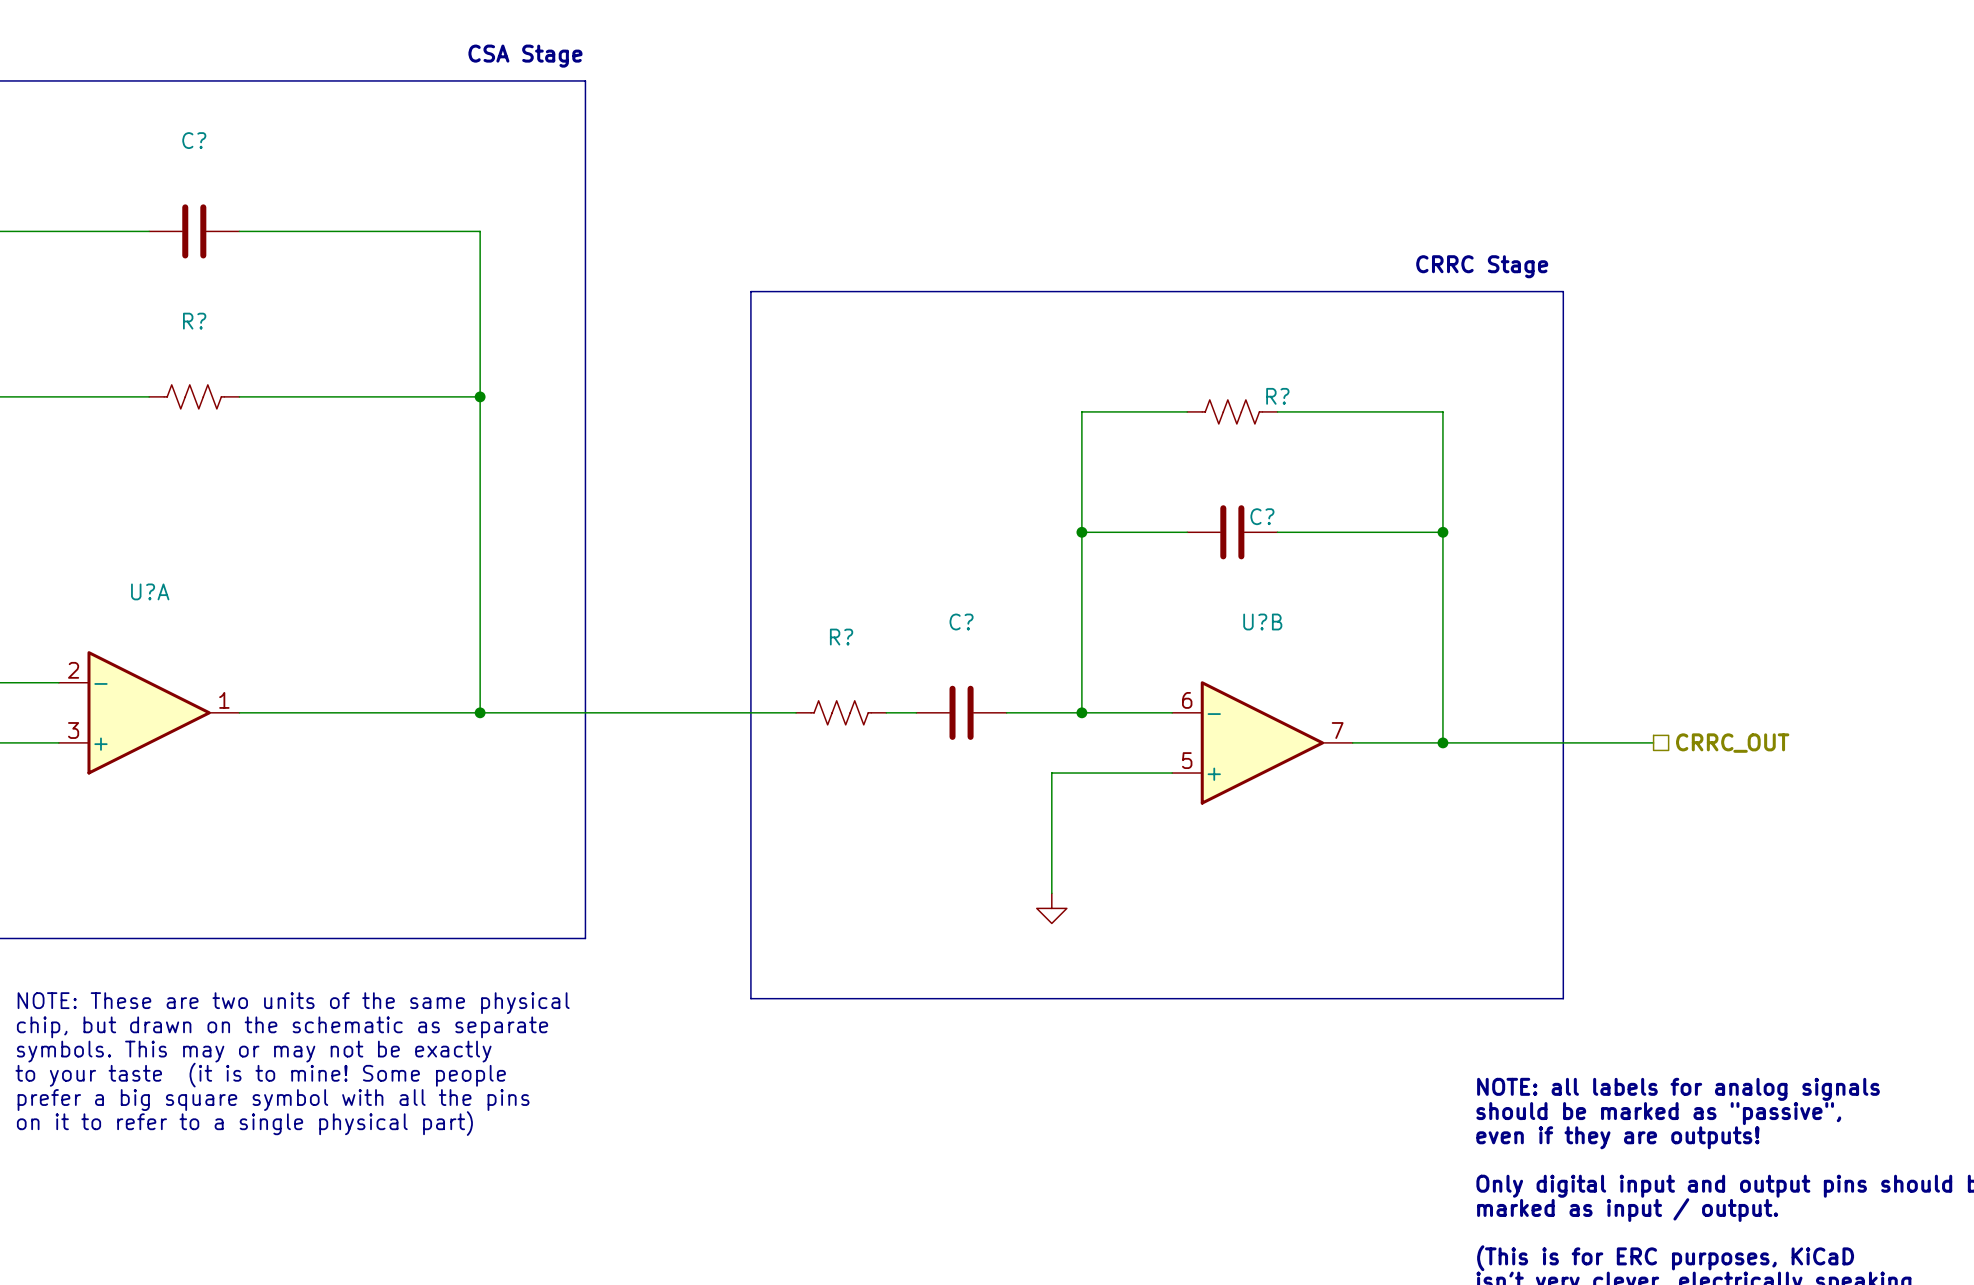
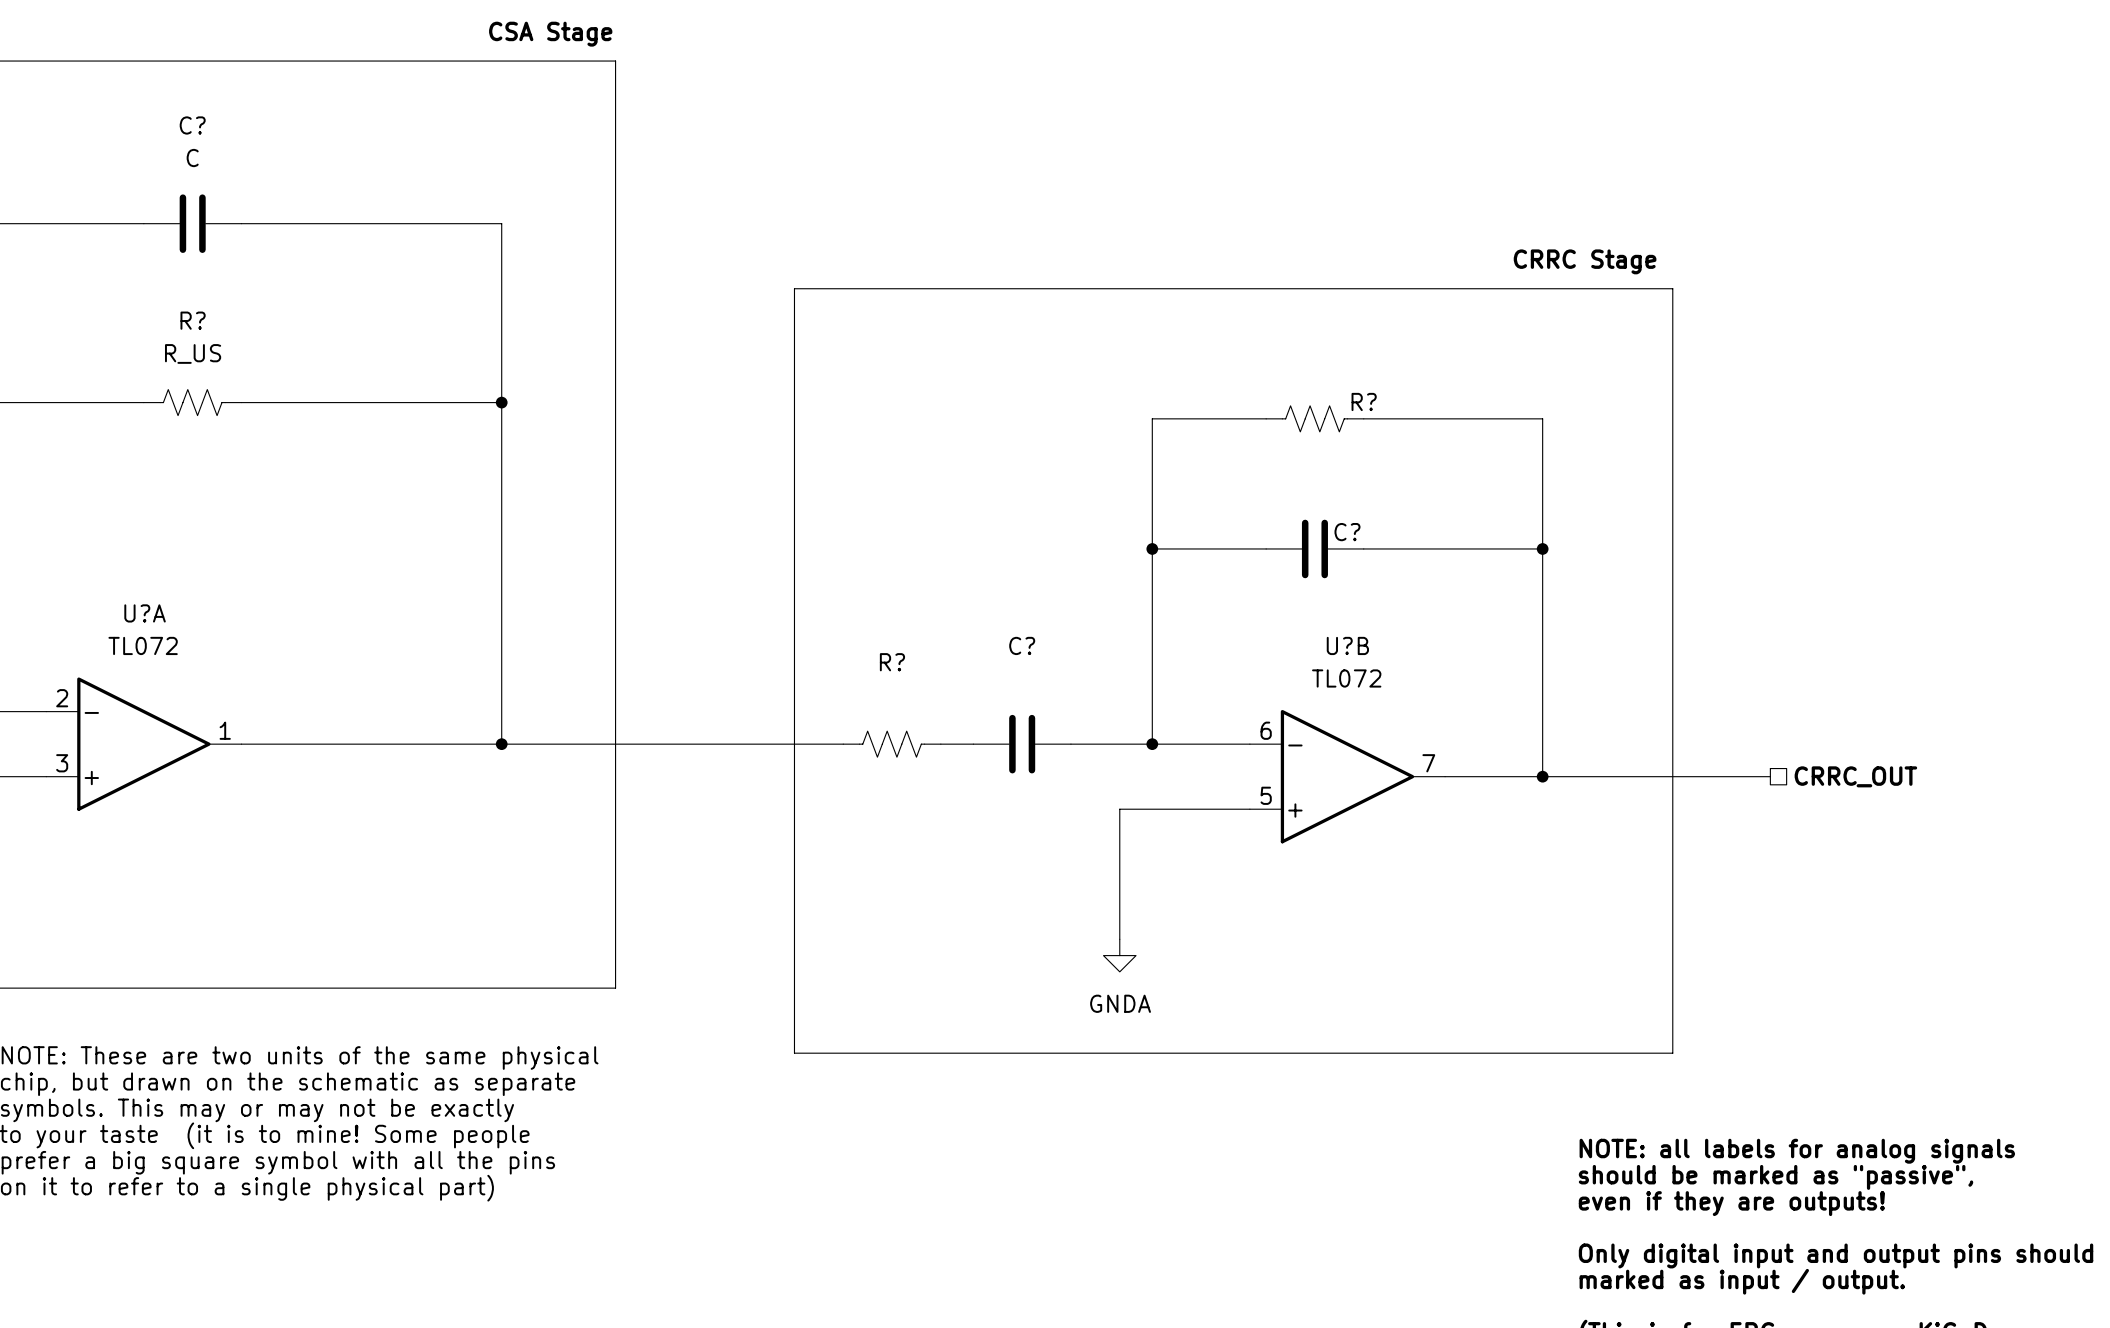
C? value: none -> C (192, 158)
R? value: none -> R_US (193, 353)
U?A value: none -> TL072 (143, 645)
U?B value: none -> TL072 (1346, 678)
power symbol text: none -> GNDA (1120, 1003)

